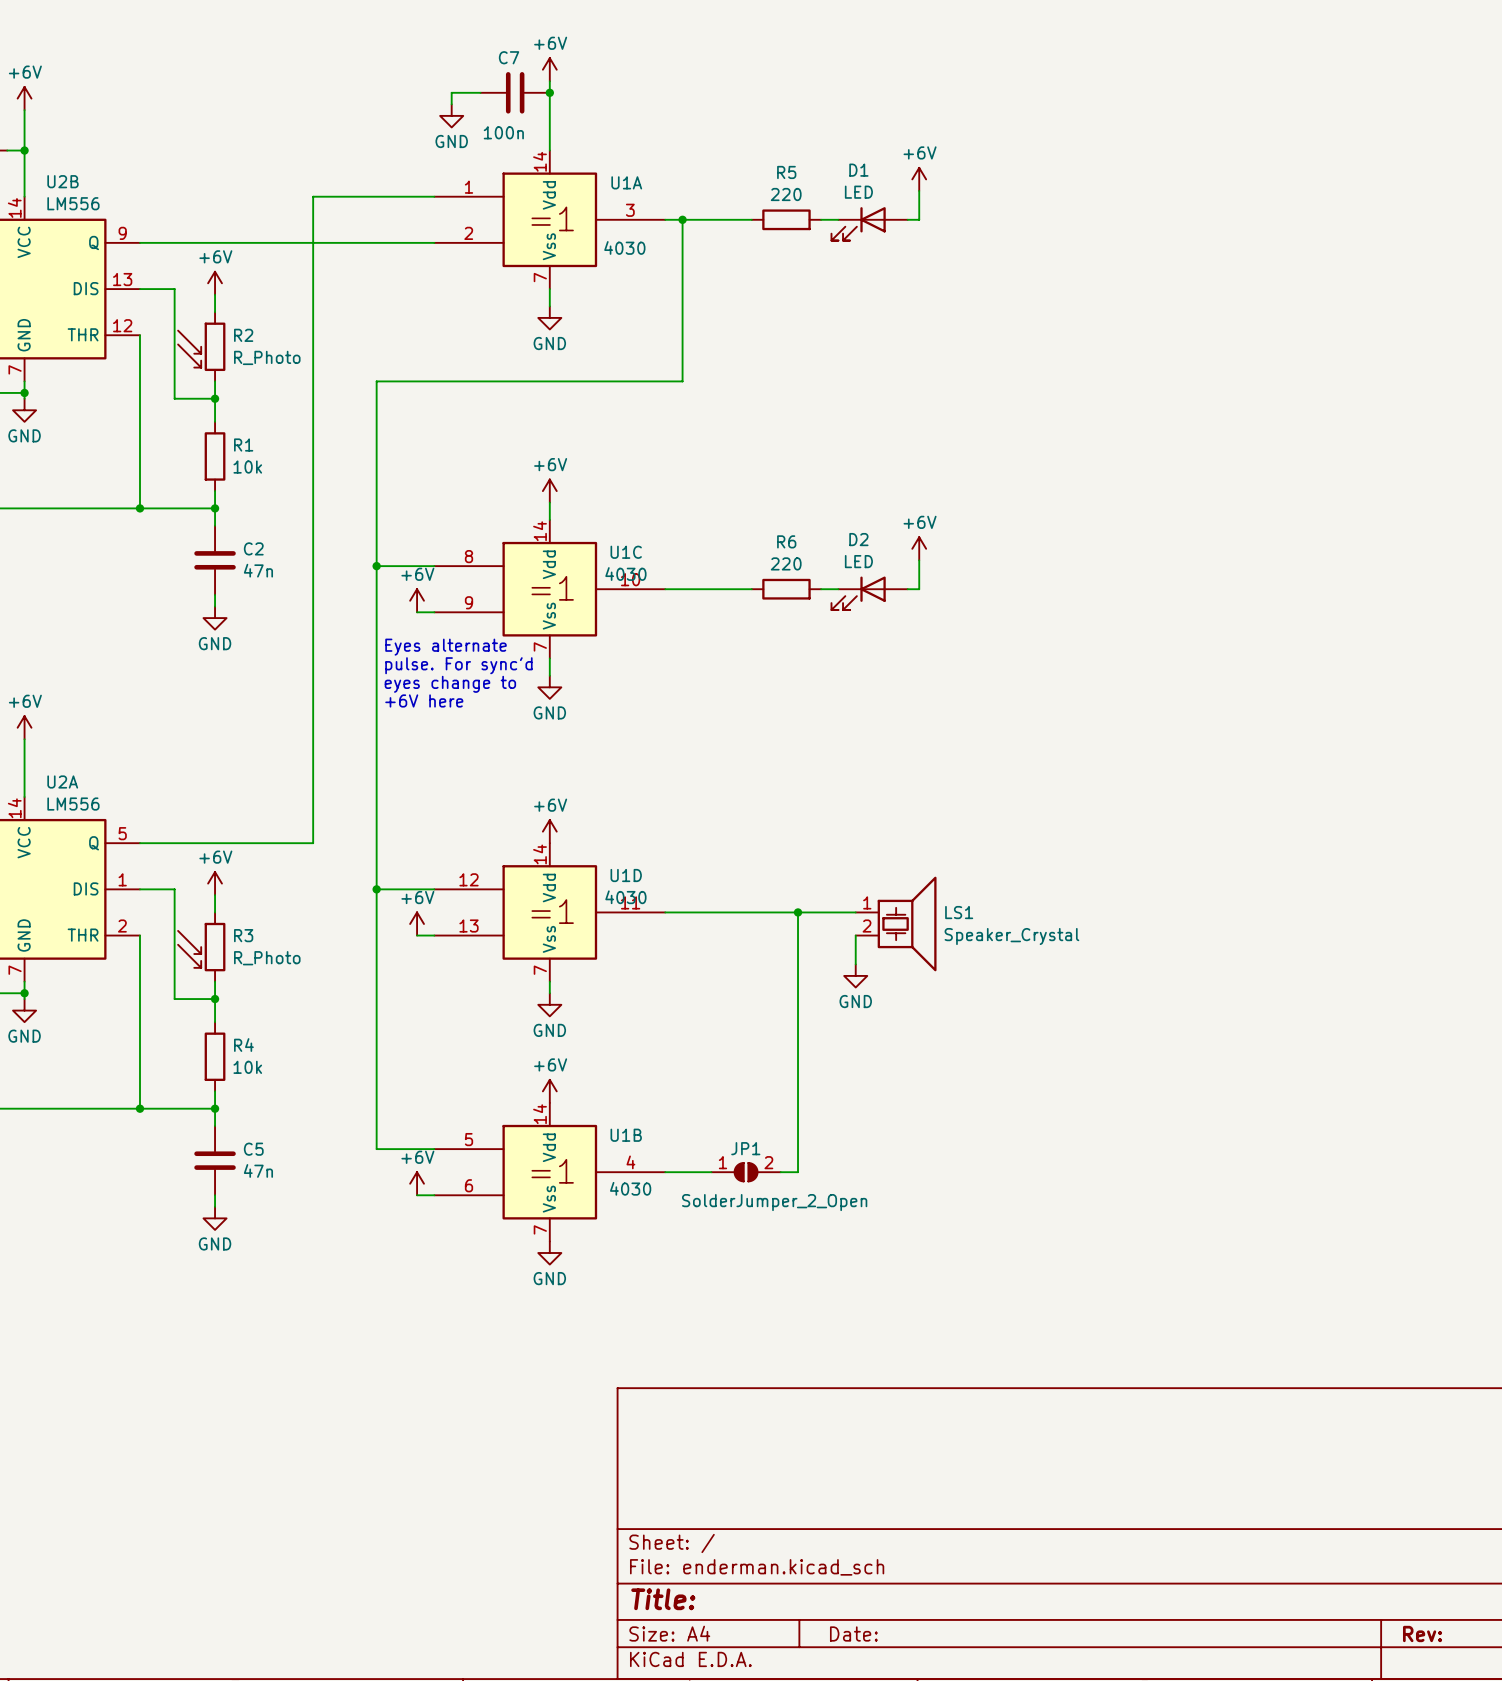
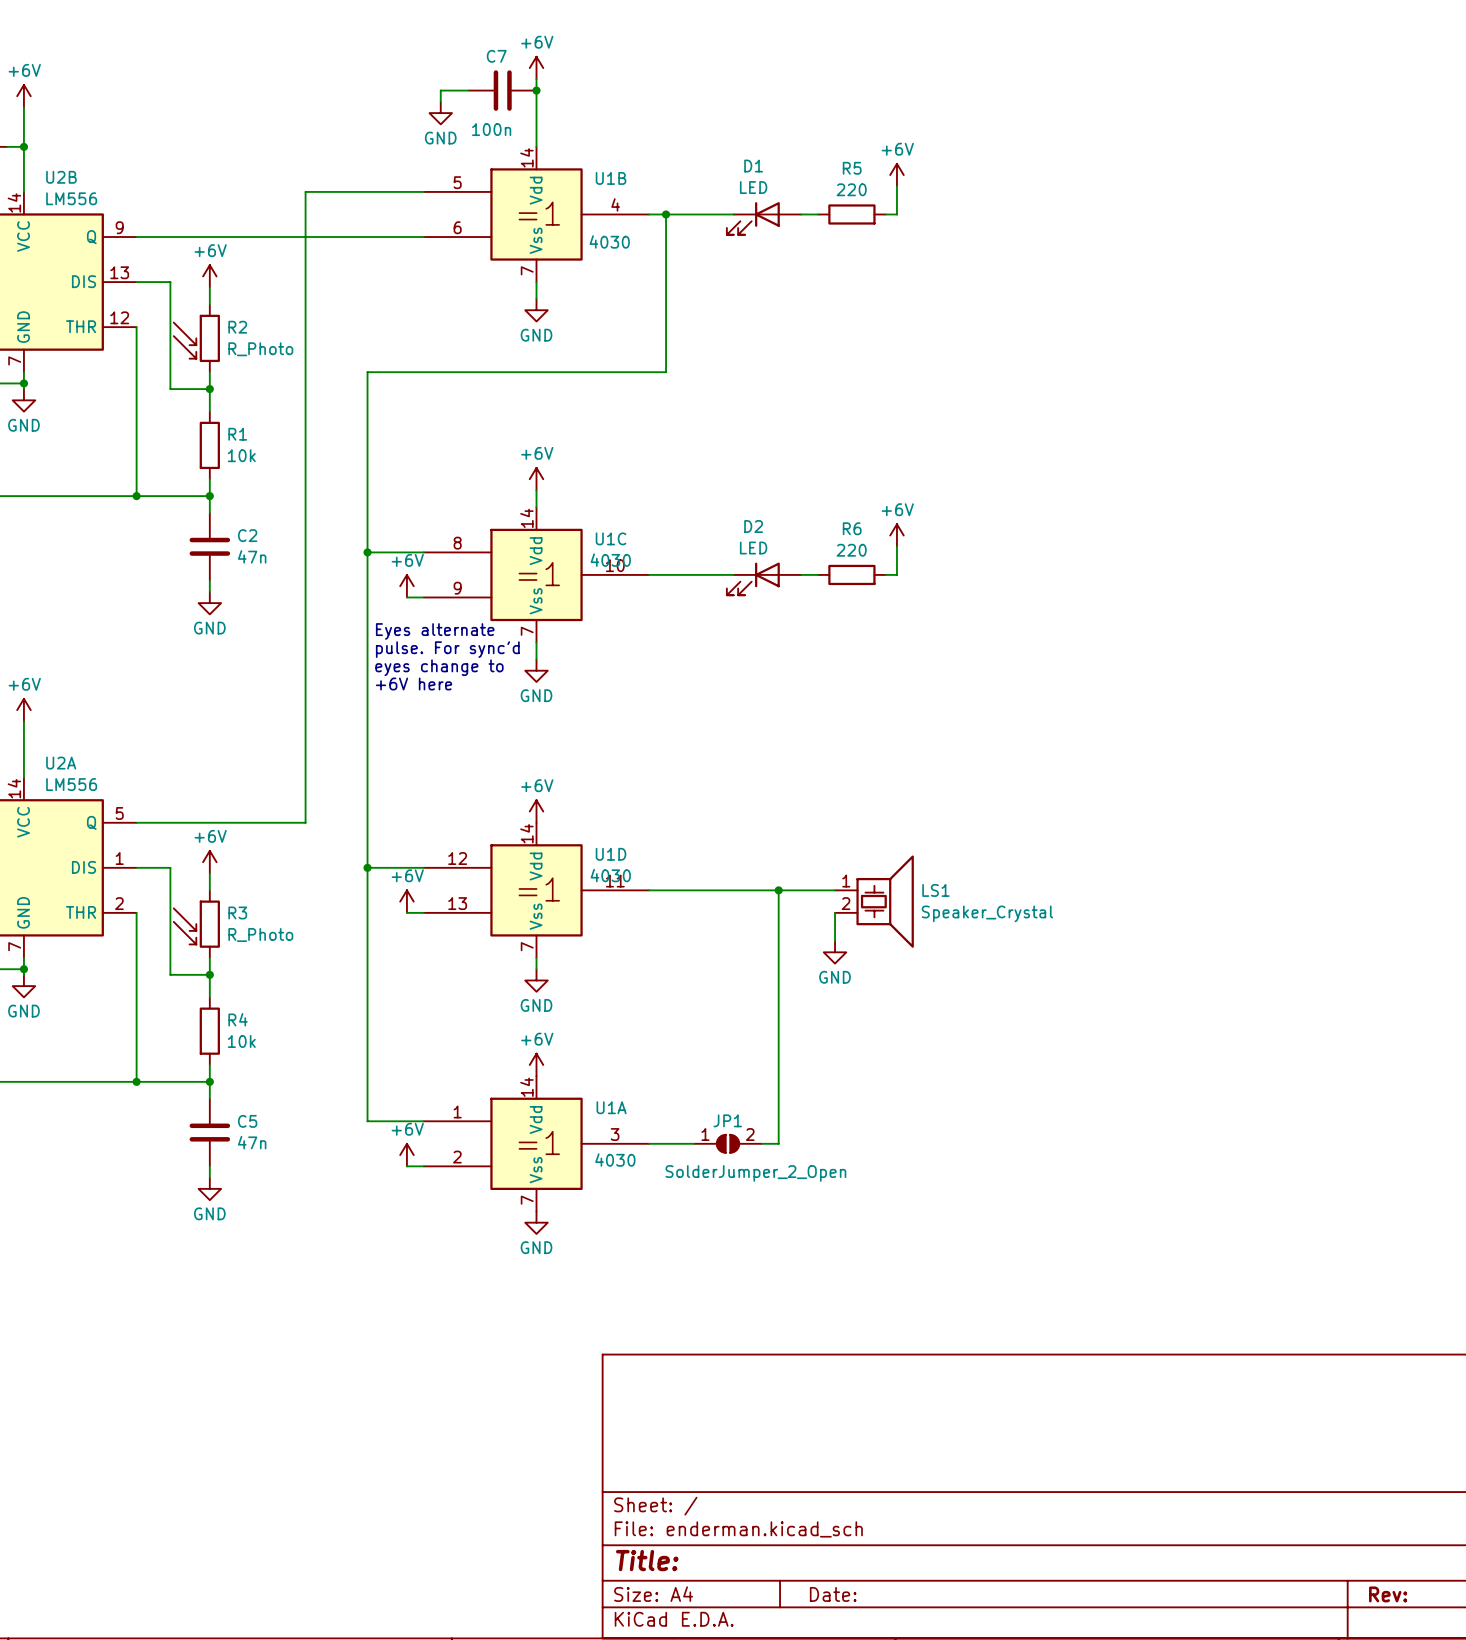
U1A position: (549, 219) -> (536, 1143)
R5 position: (786, 219) -> (851, 214)
D1 position: (869, 223) -> (764, 218)
R6 position: (786, 589) -> (851, 574)
D2 position: (869, 593) -> (764, 578)
U1B position: (549, 1172) -> (536, 214)

